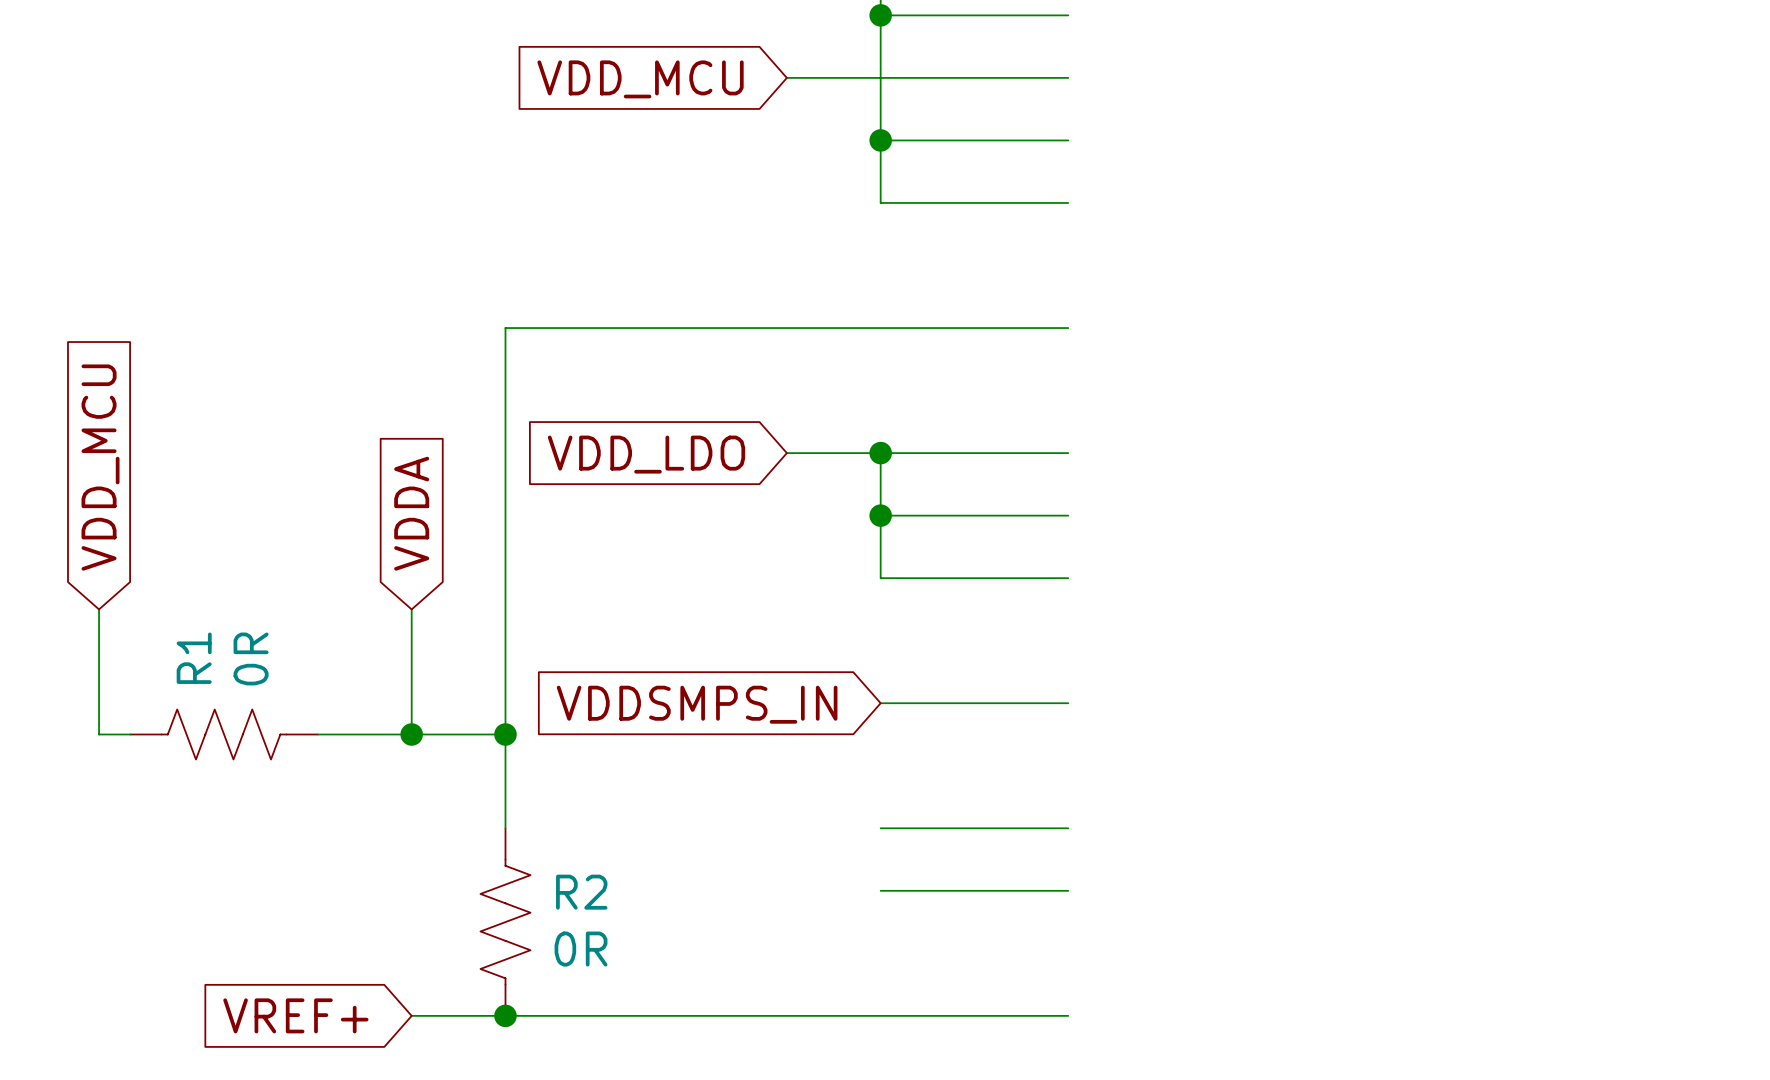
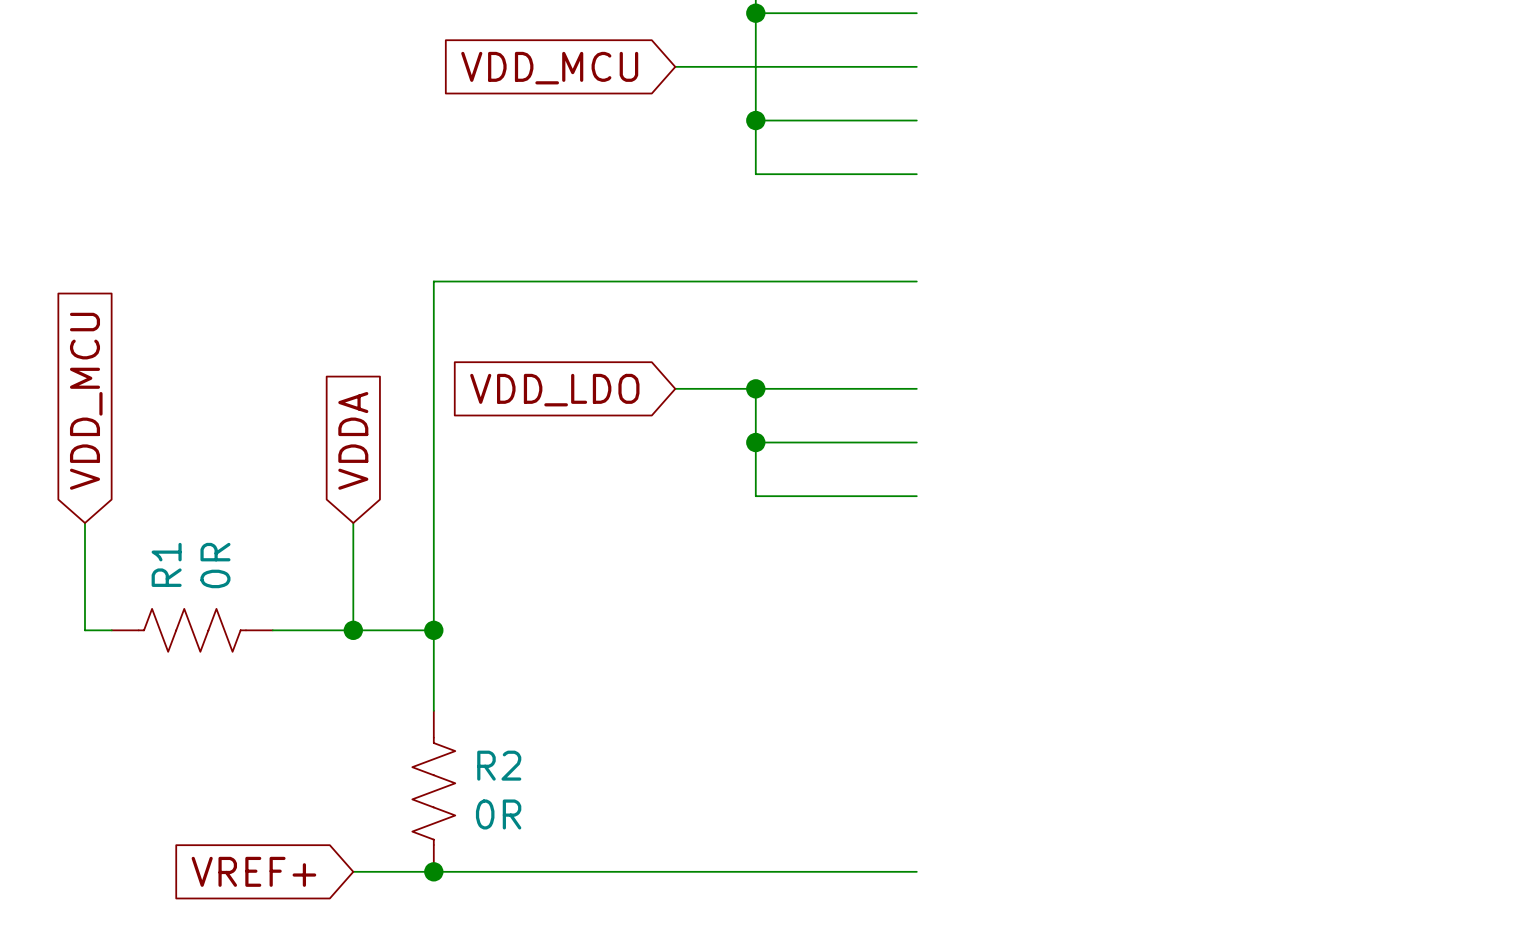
wire: (880, 703) (1068, 703) -> none
global label: VDDSMPS_IN (697, 704) -> none
wire: (880, 828) (1068, 828) -> none
wire: (880, 890) (1068, 890) -> none

